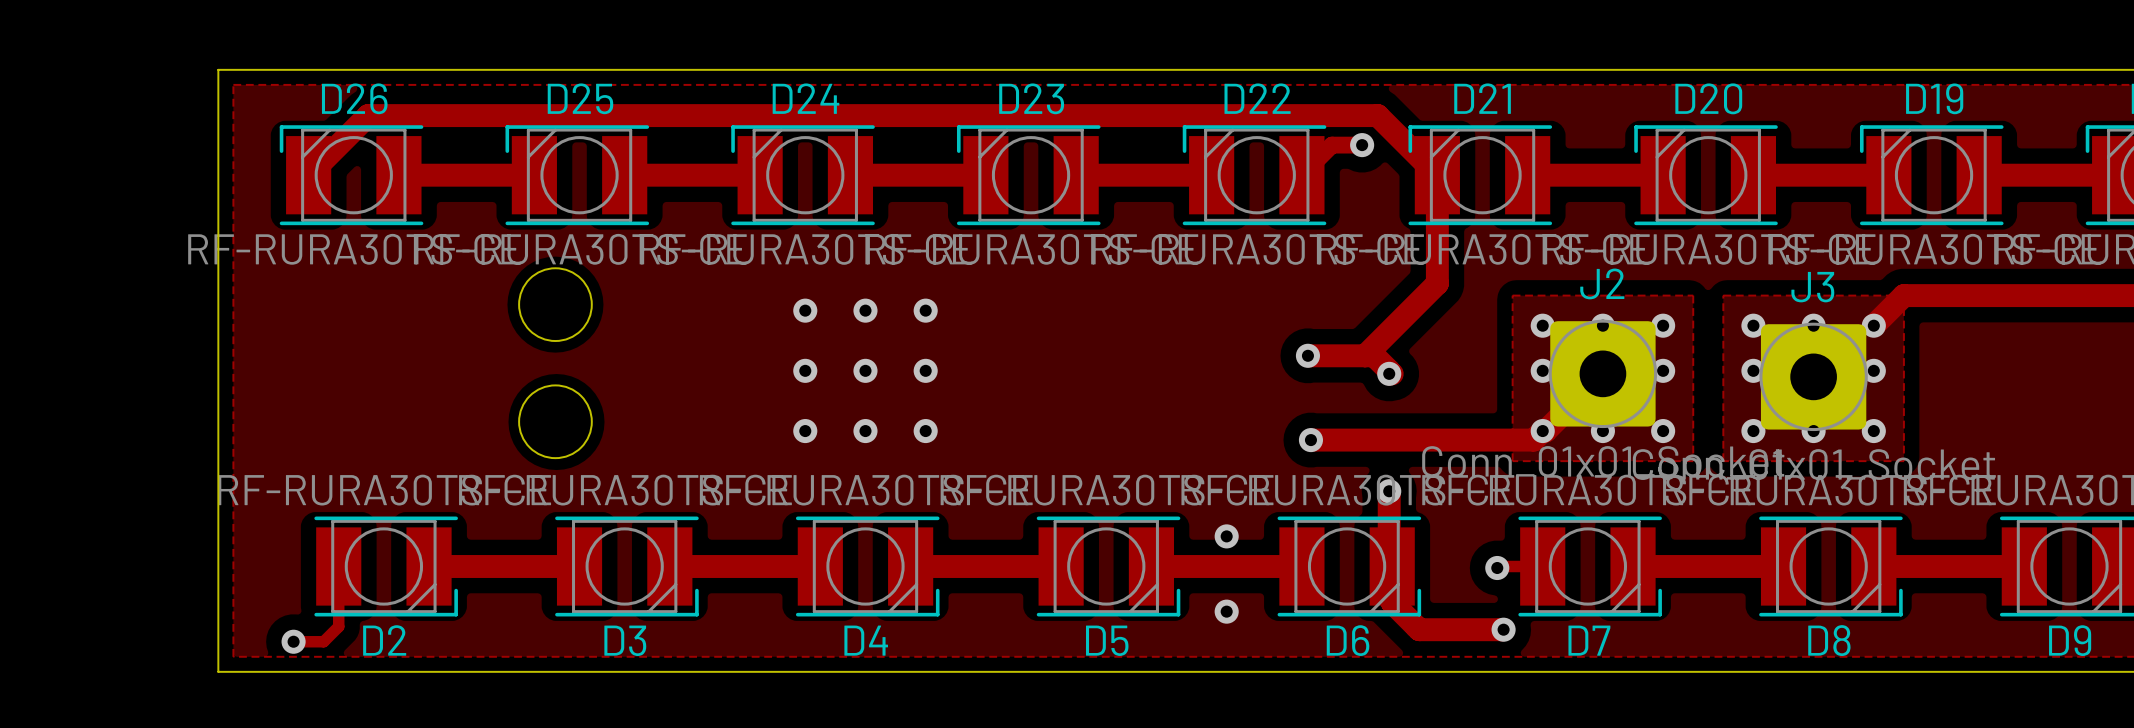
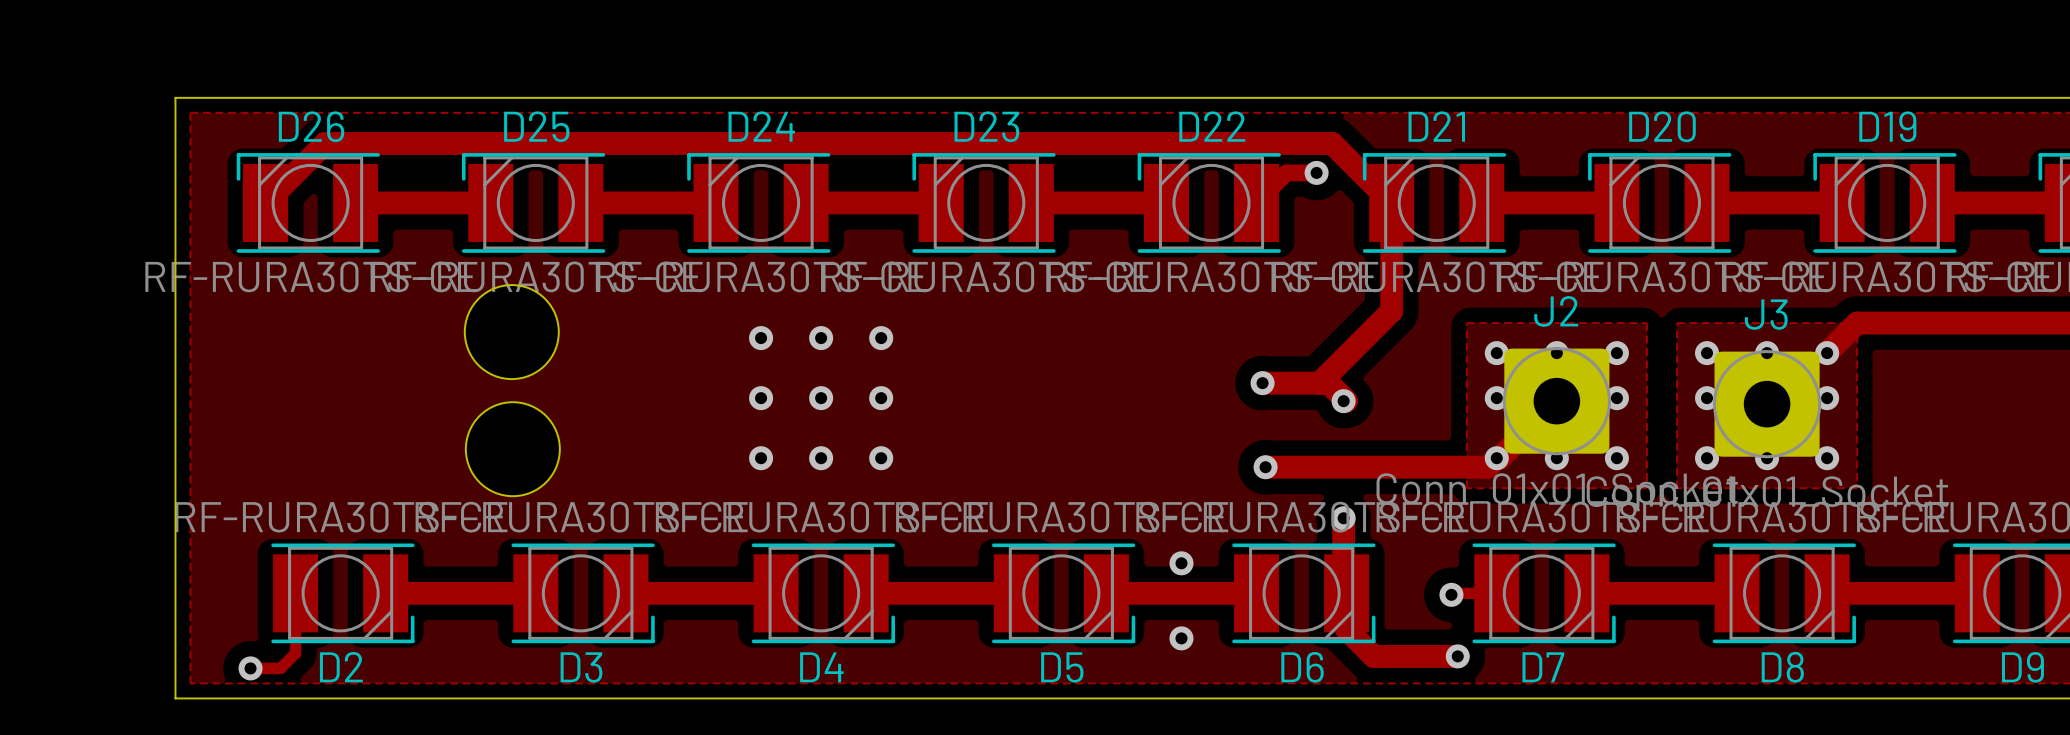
round board edge size: [518, 267, 593, 342] -> [464, 284, 560, 380]
round board edge size: [518, 384, 593, 459] -> [465, 401, 561, 497]

